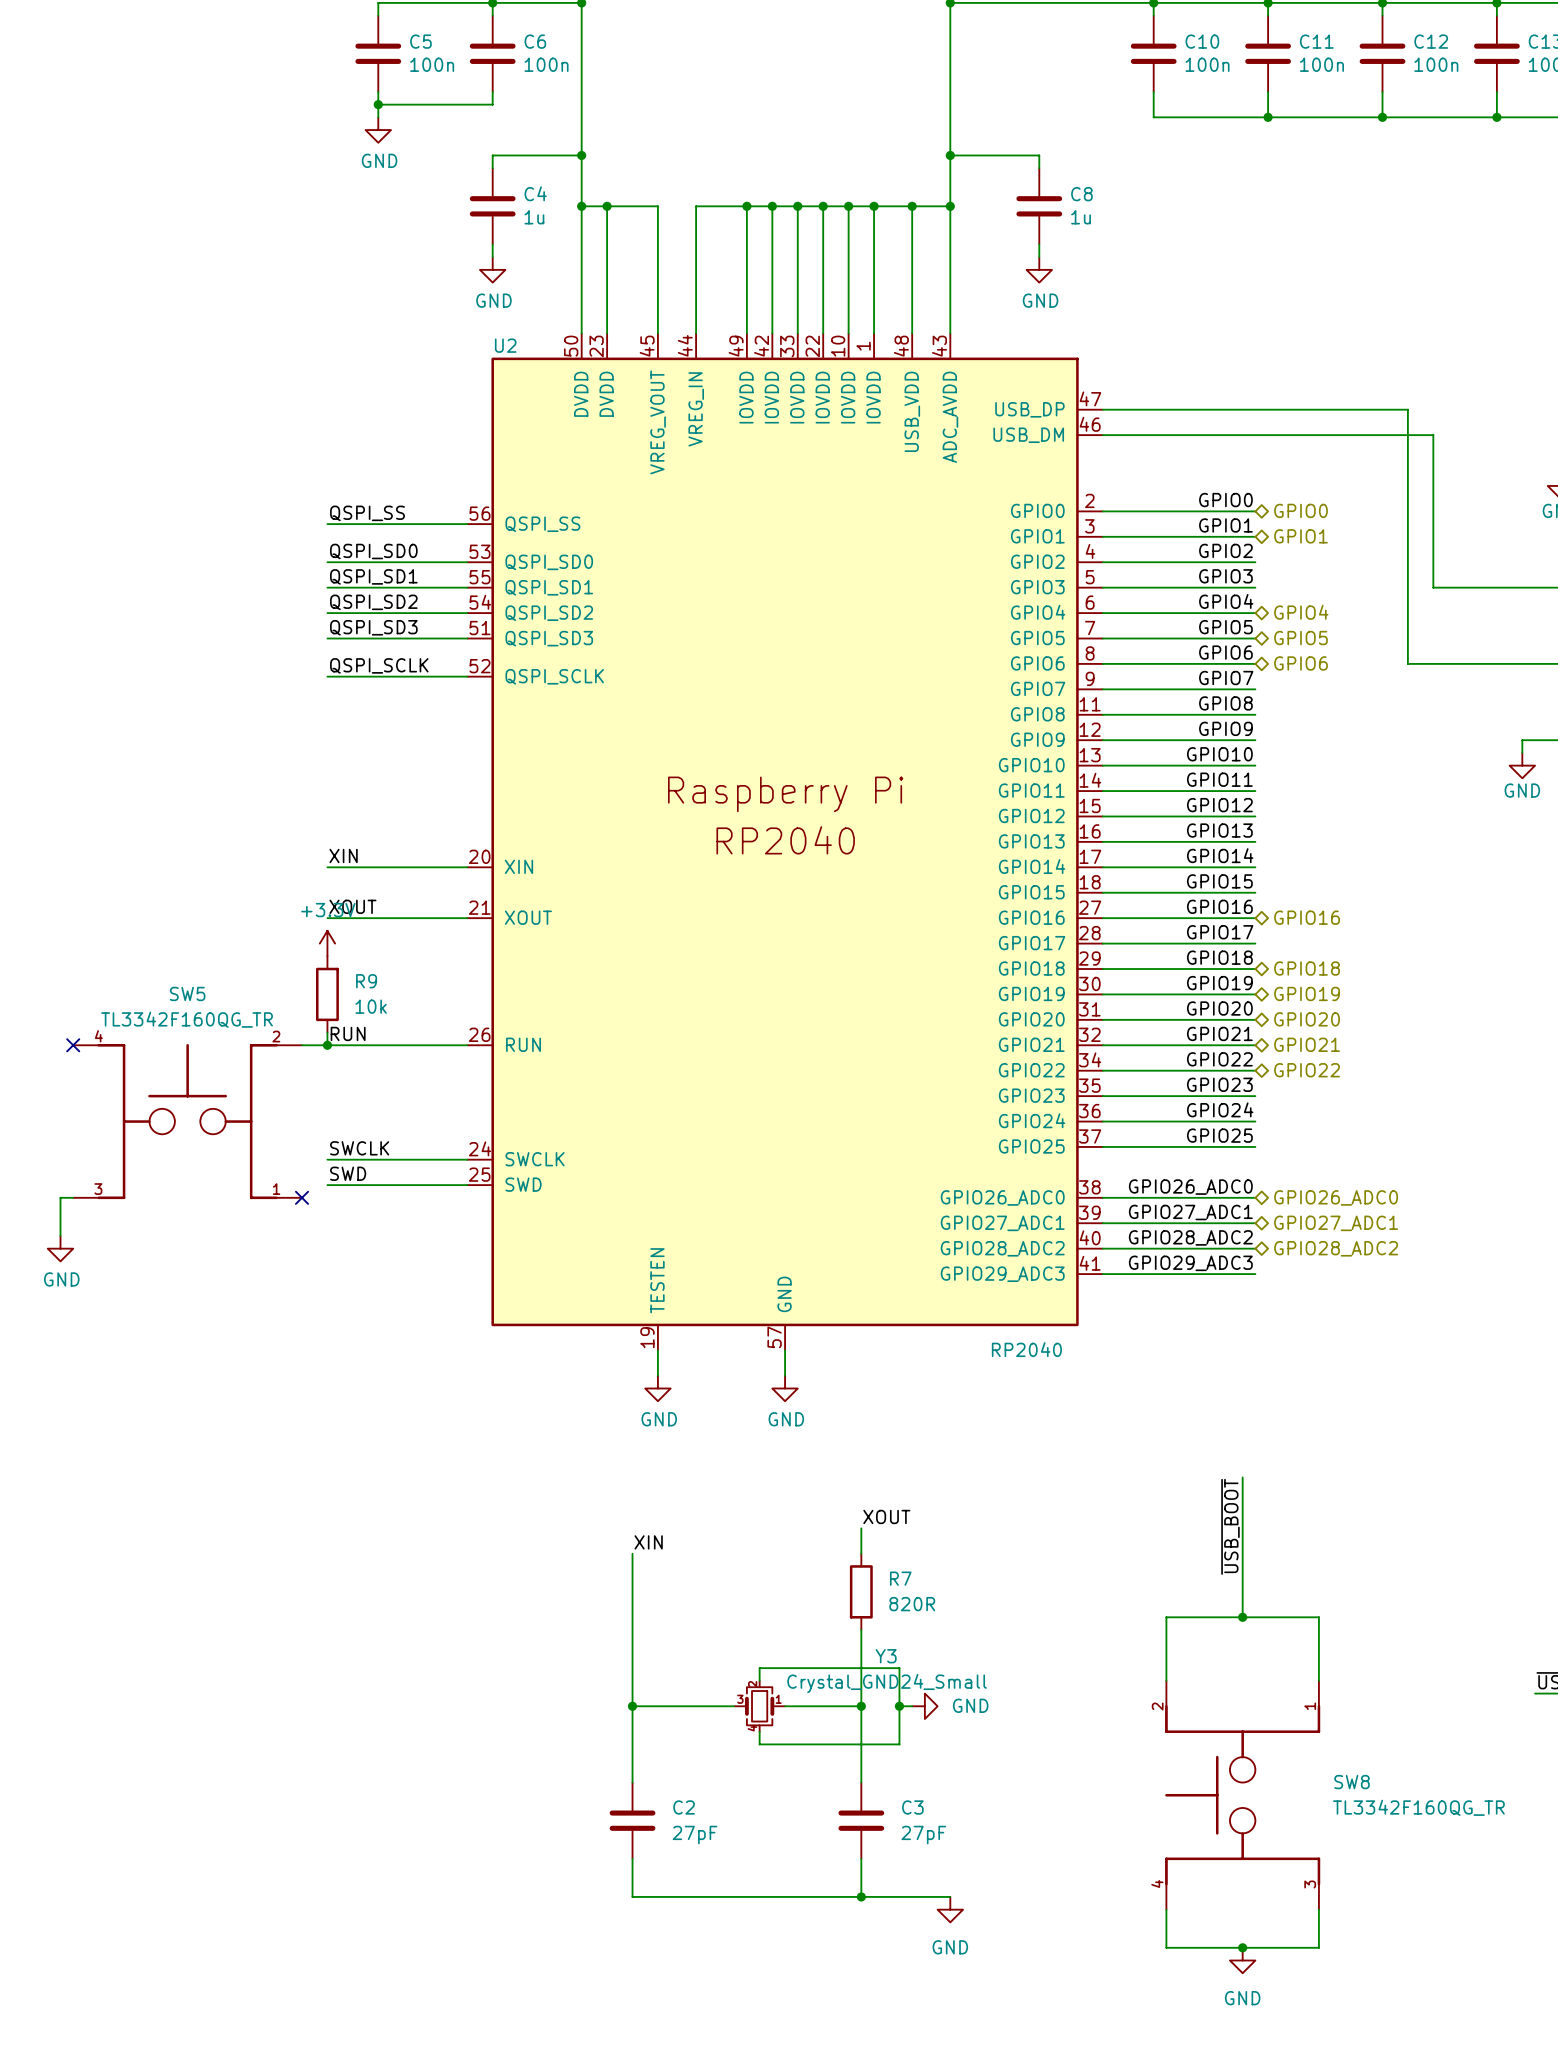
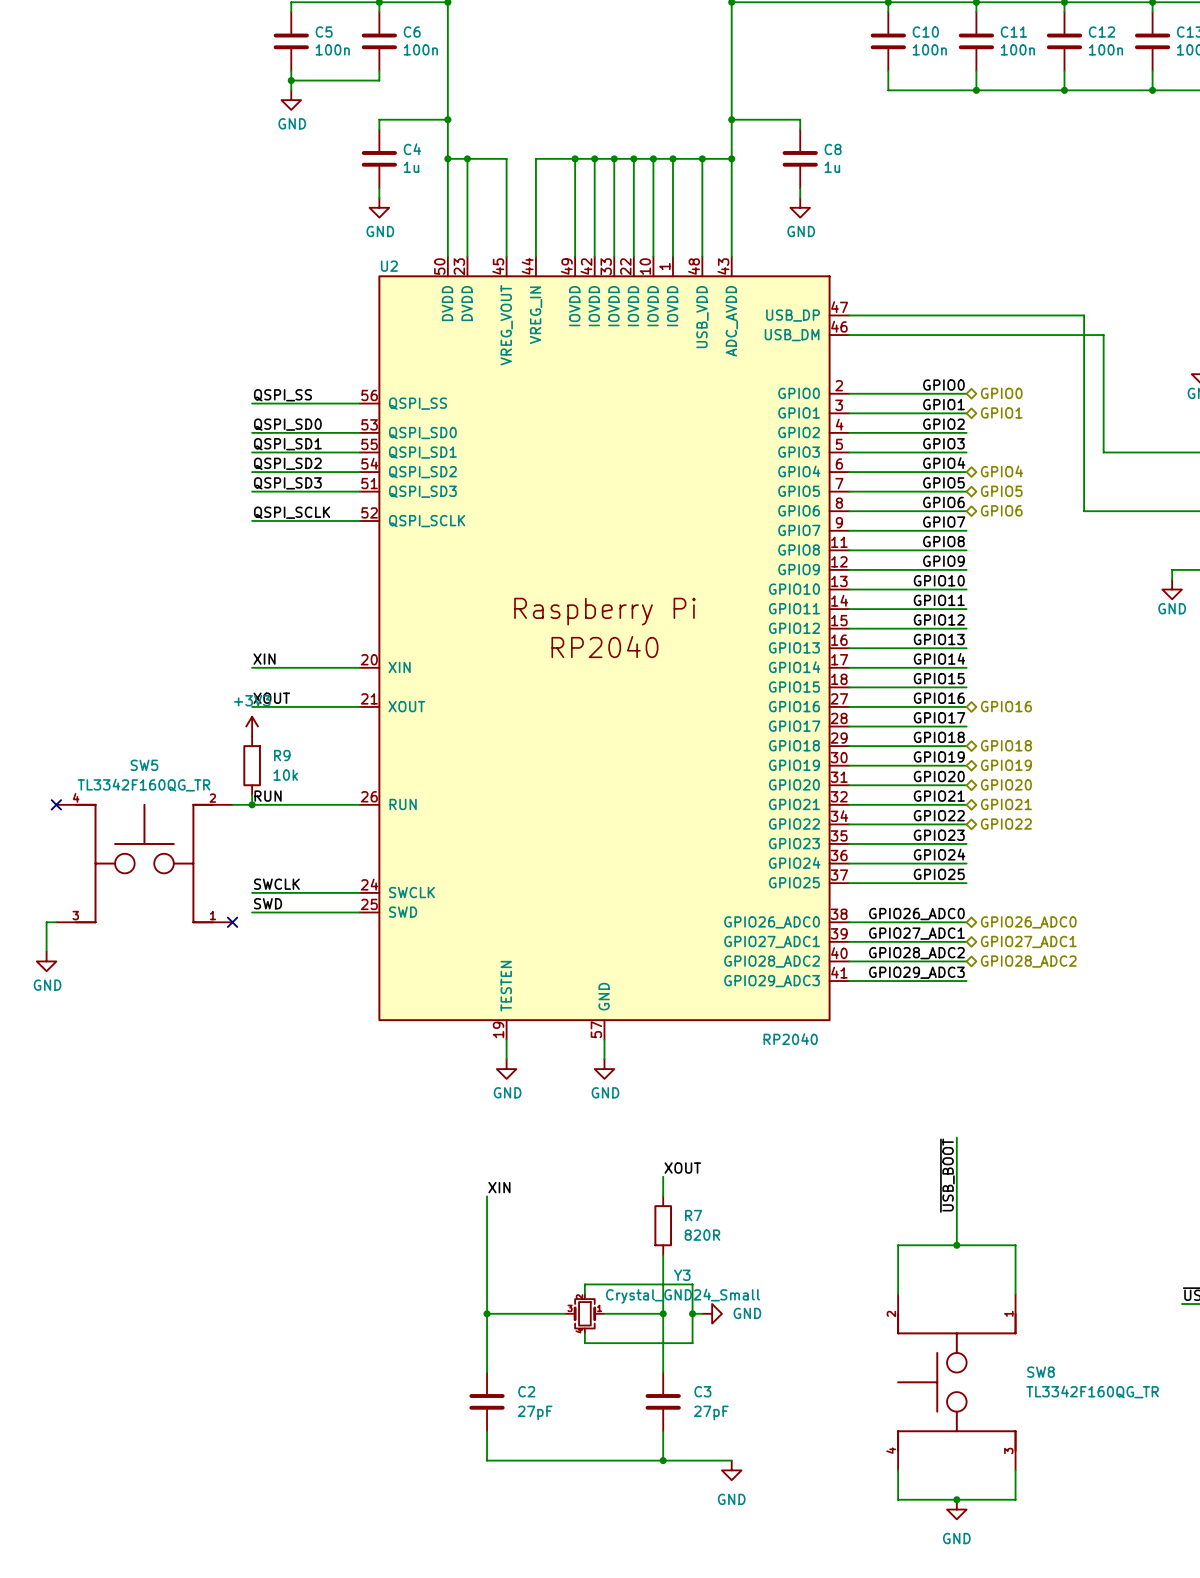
power symbol: +3.3V (327, 943) -> +3V3 (252, 726)

